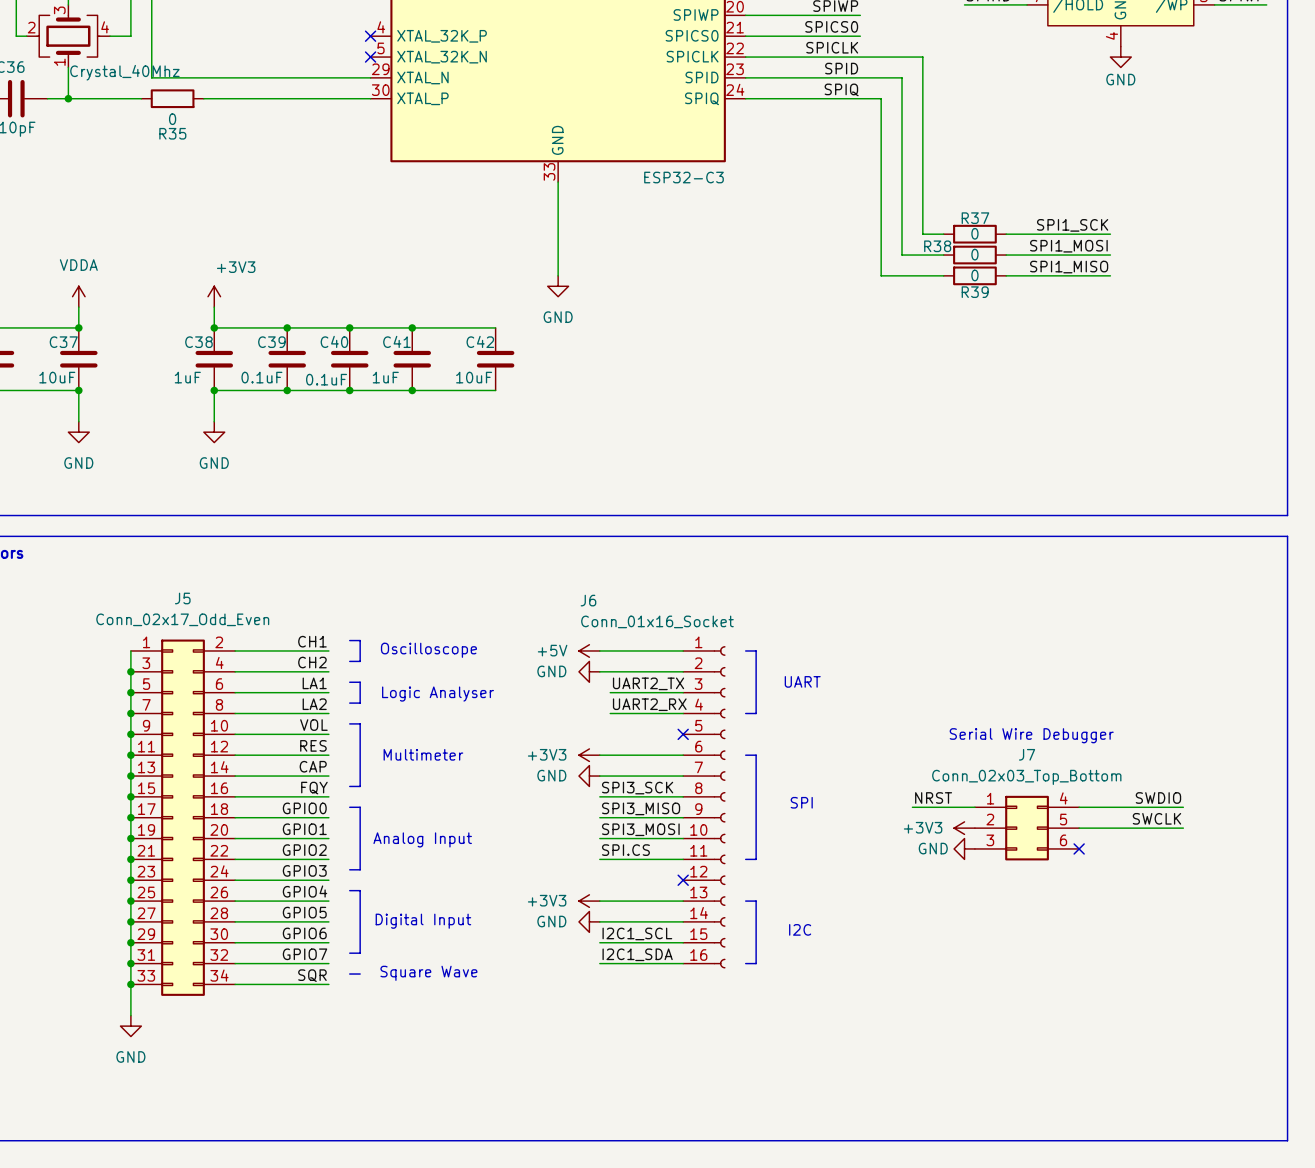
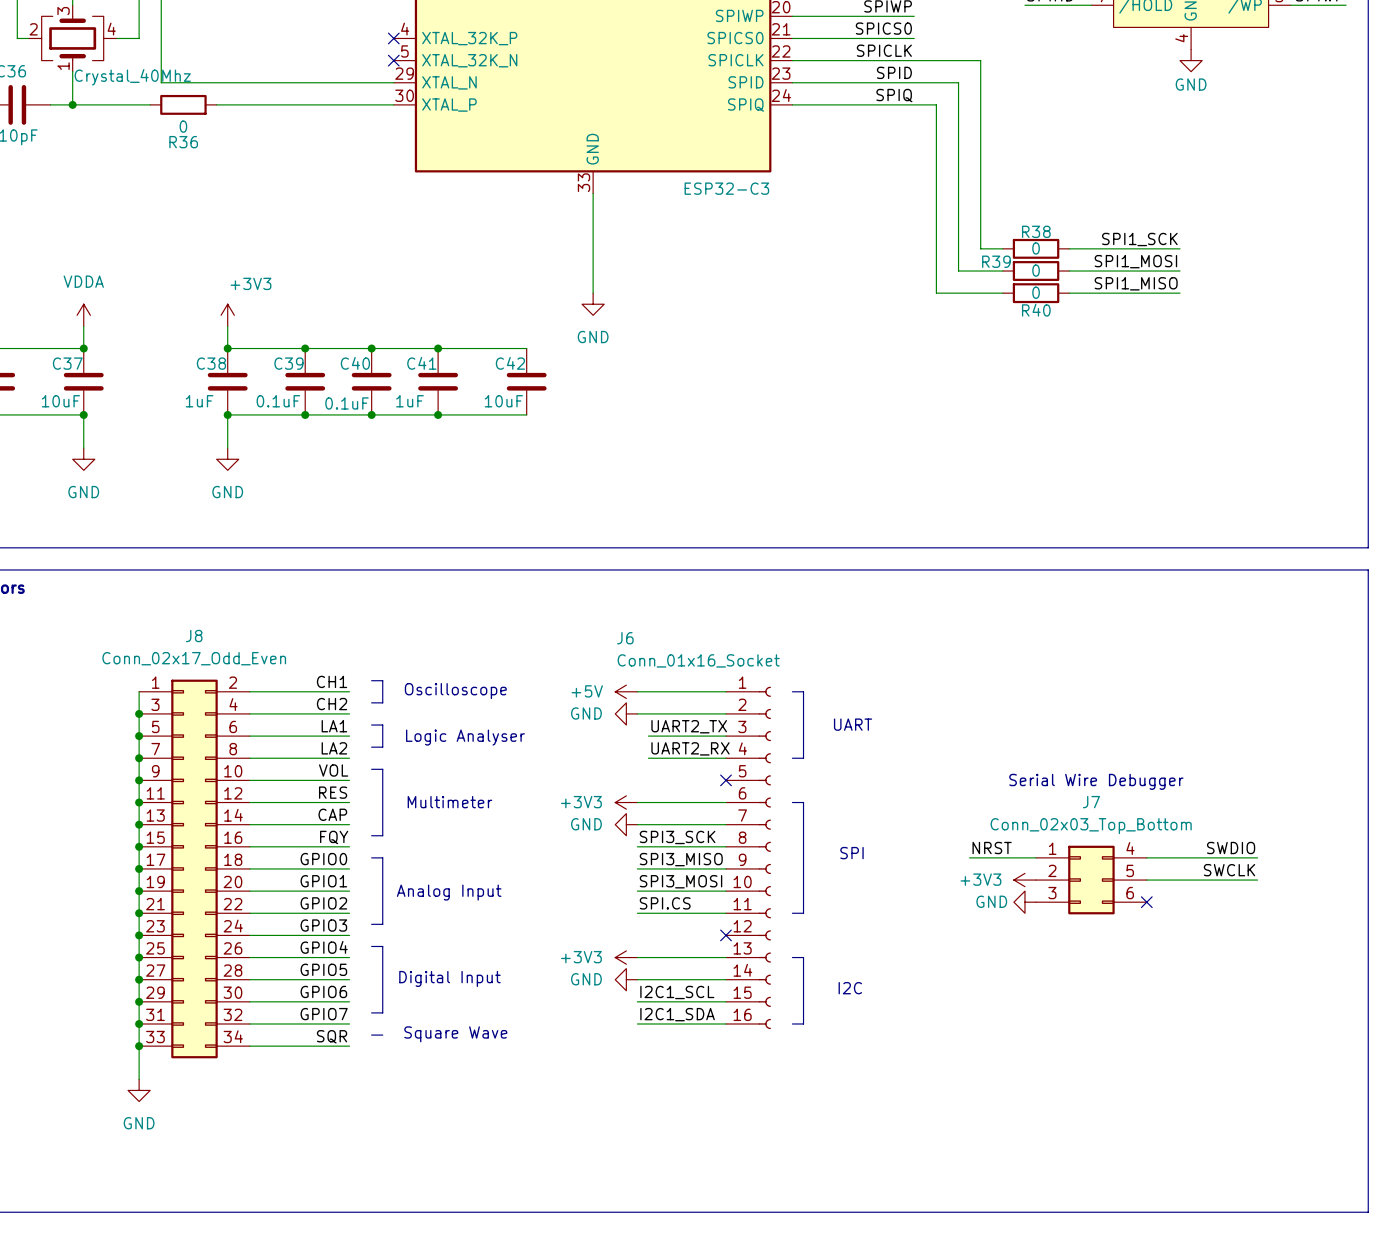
R35 name: R35 (172, 133) -> R36 (183, 142)
R37 name: R37 (975, 218) -> R38 (1036, 231)
R38 name: R38 (937, 246) -> R39 (996, 261)
R39 name: R39 (975, 292) -> R40 (1036, 310)
J5 name: J5 (182, 598) -> J8 (194, 636)

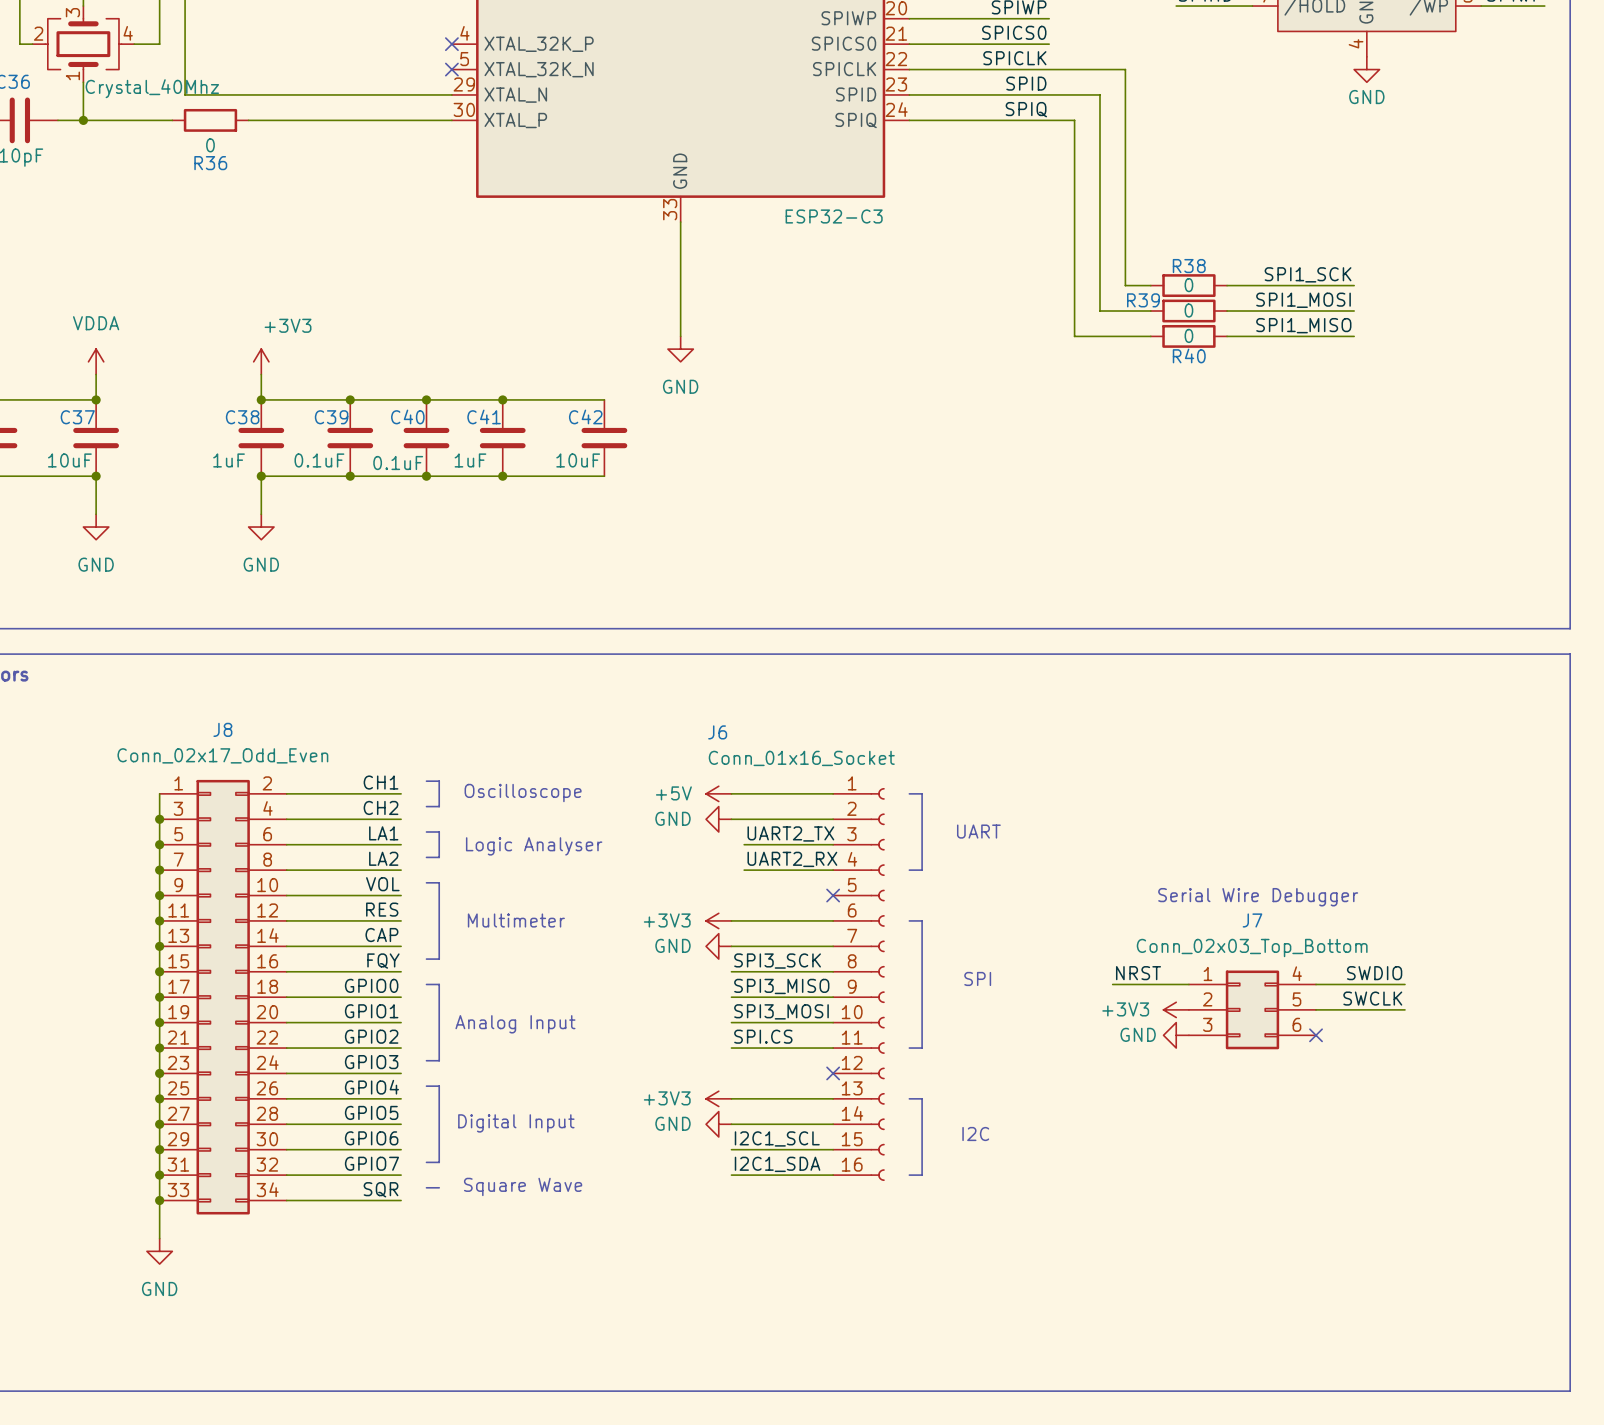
label position: SWDIO (1231, 848) -> SWDIO (1374, 973)
wire: (1224, 857) (1257, 857) -> none
label position: SWCLK (1229, 870) -> SWCLK (1372, 998)
wire: (1224, 880) (1257, 880) -> none

